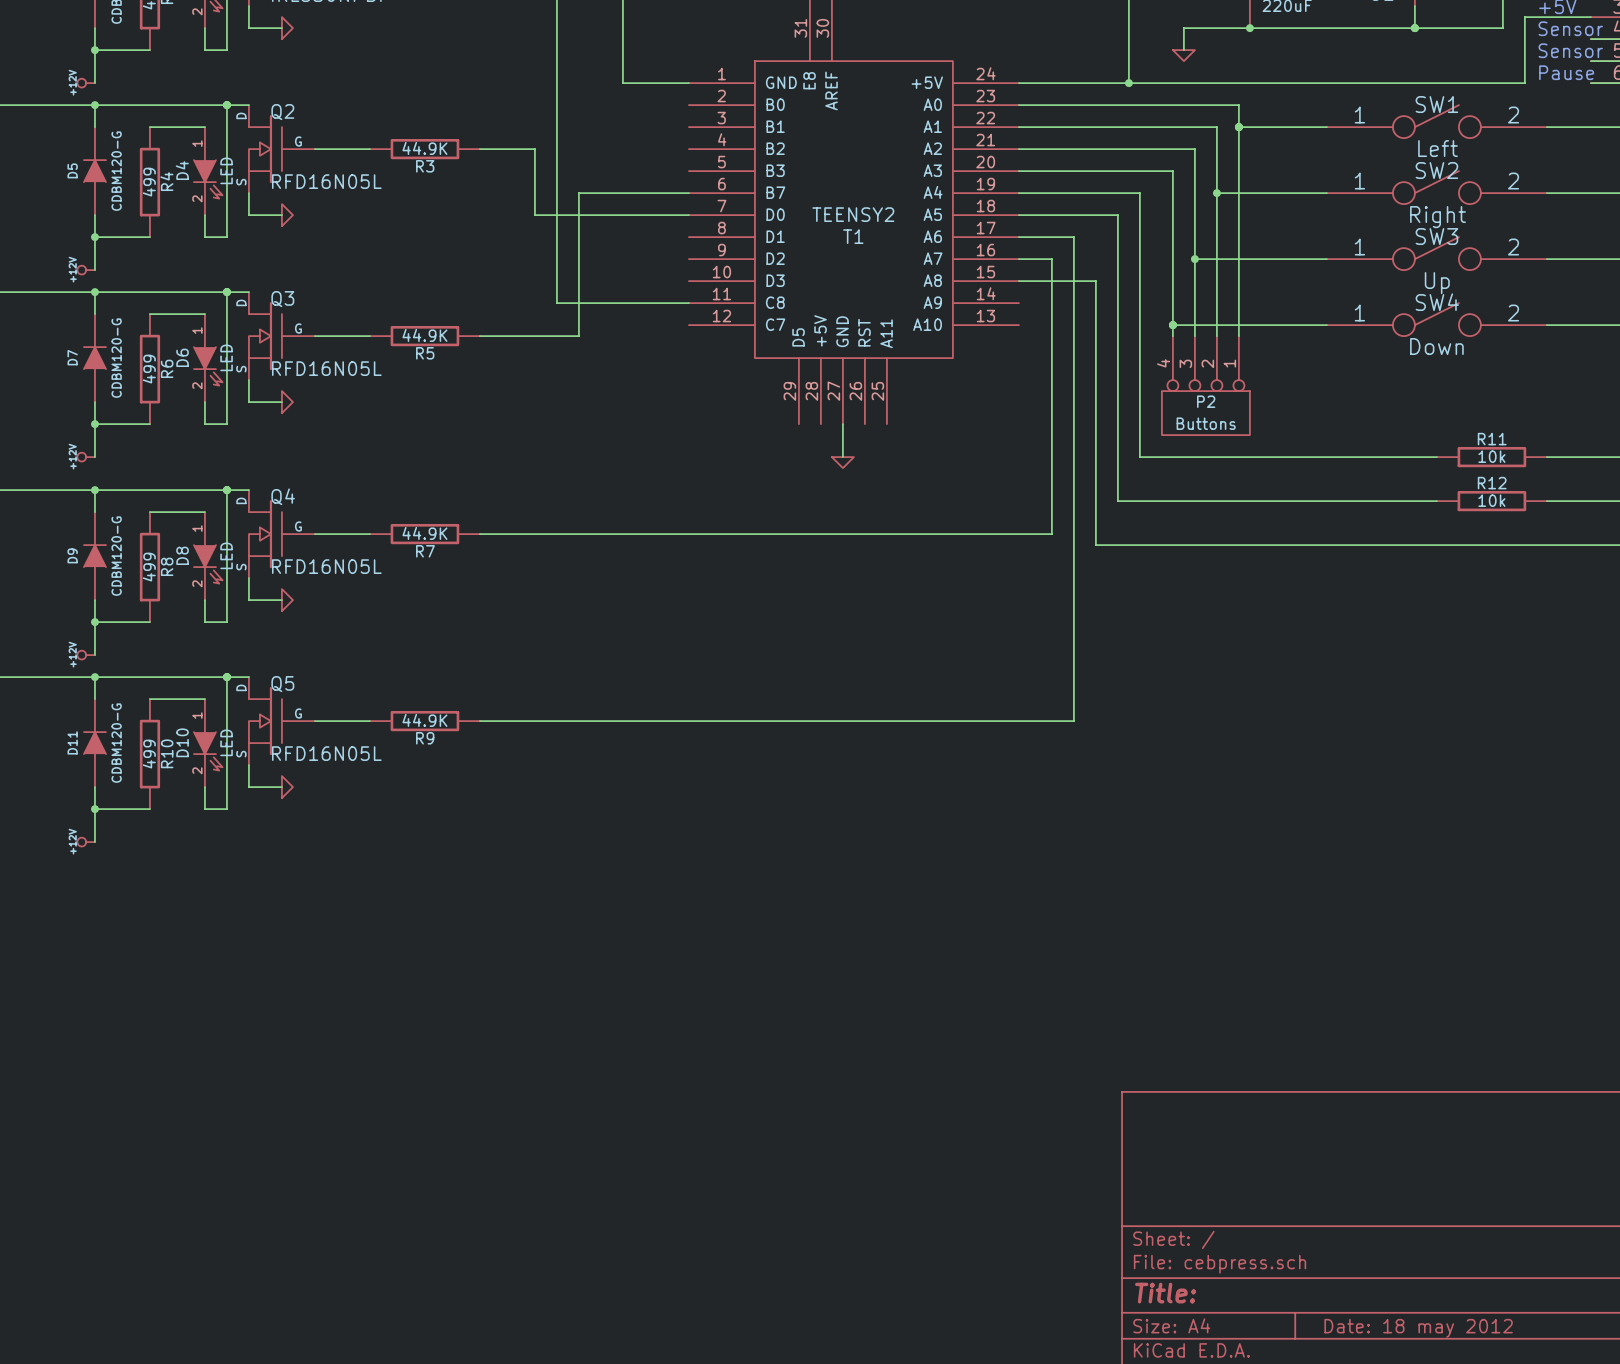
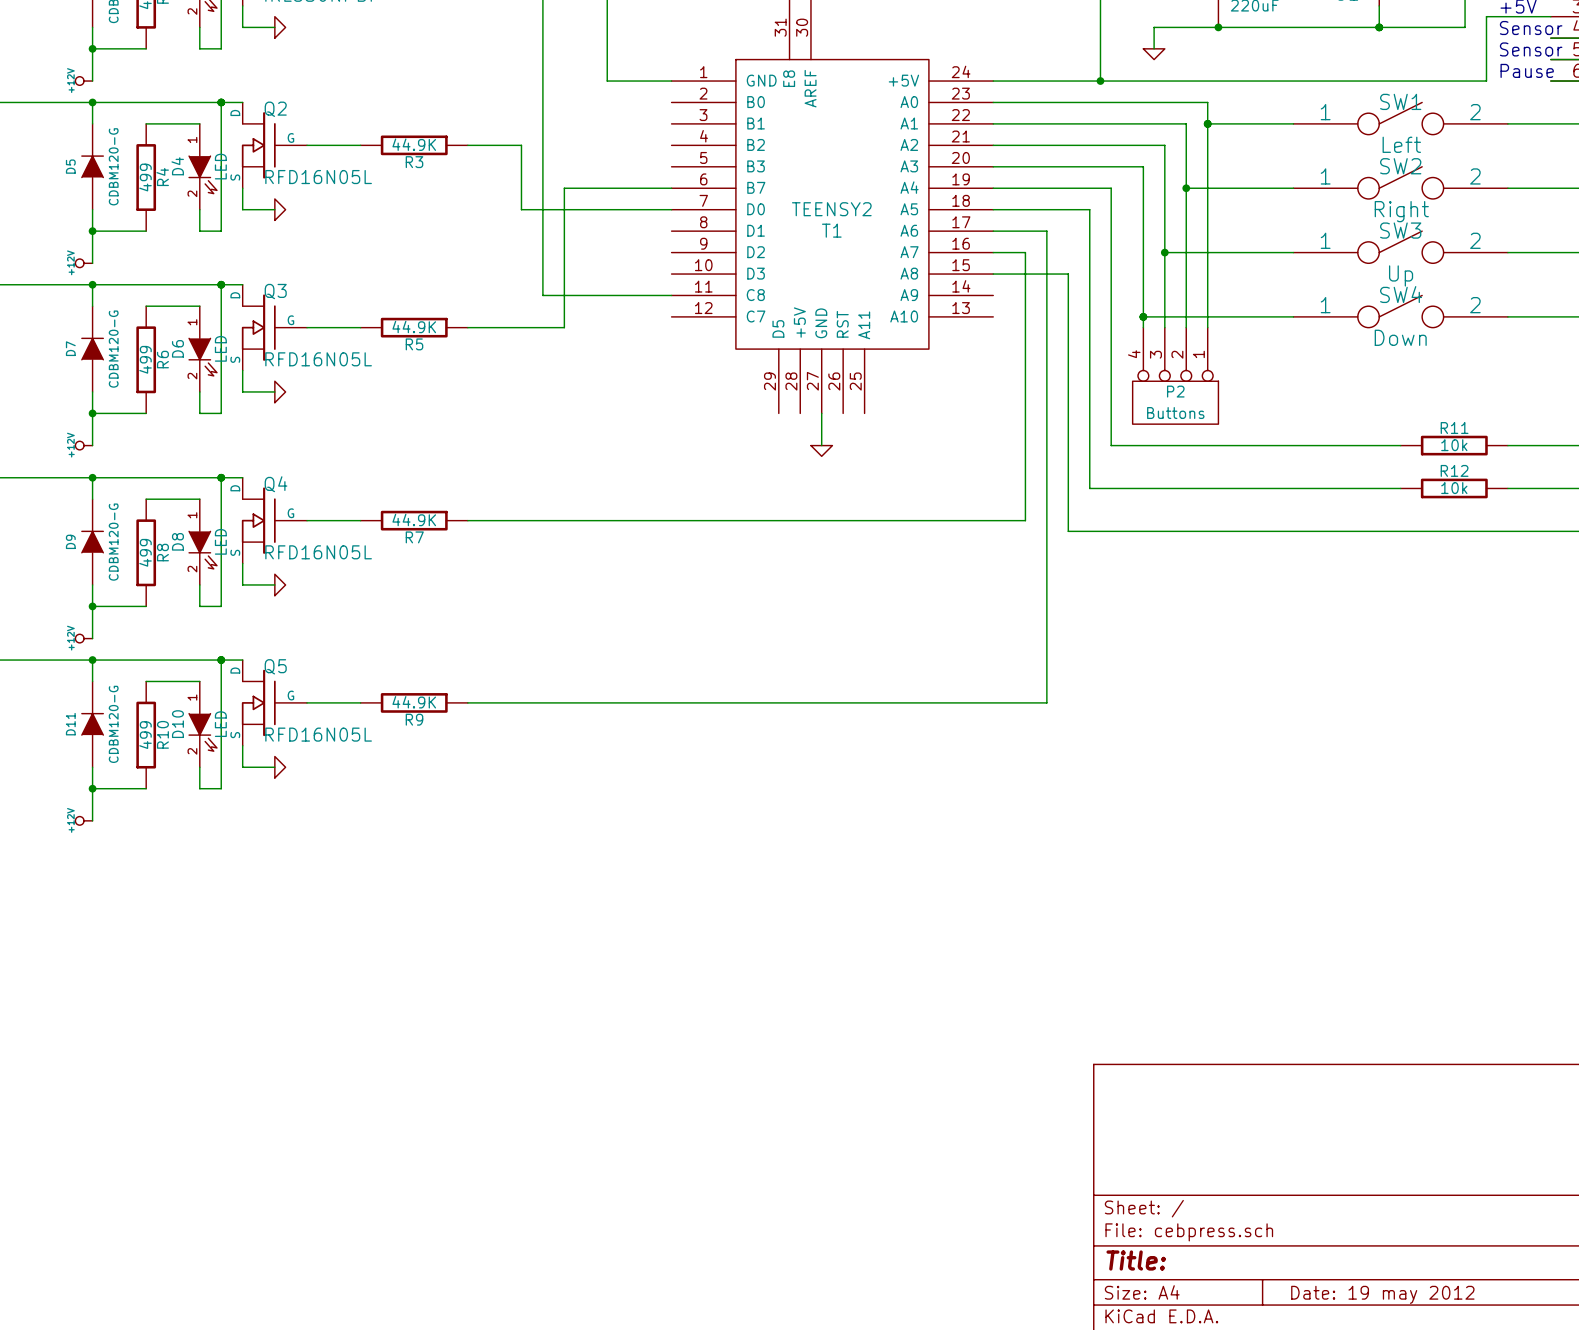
title block: Date: 18 may 2012 (1418, 1328) -> Date: 19 may 2012 (1382, 1294)

